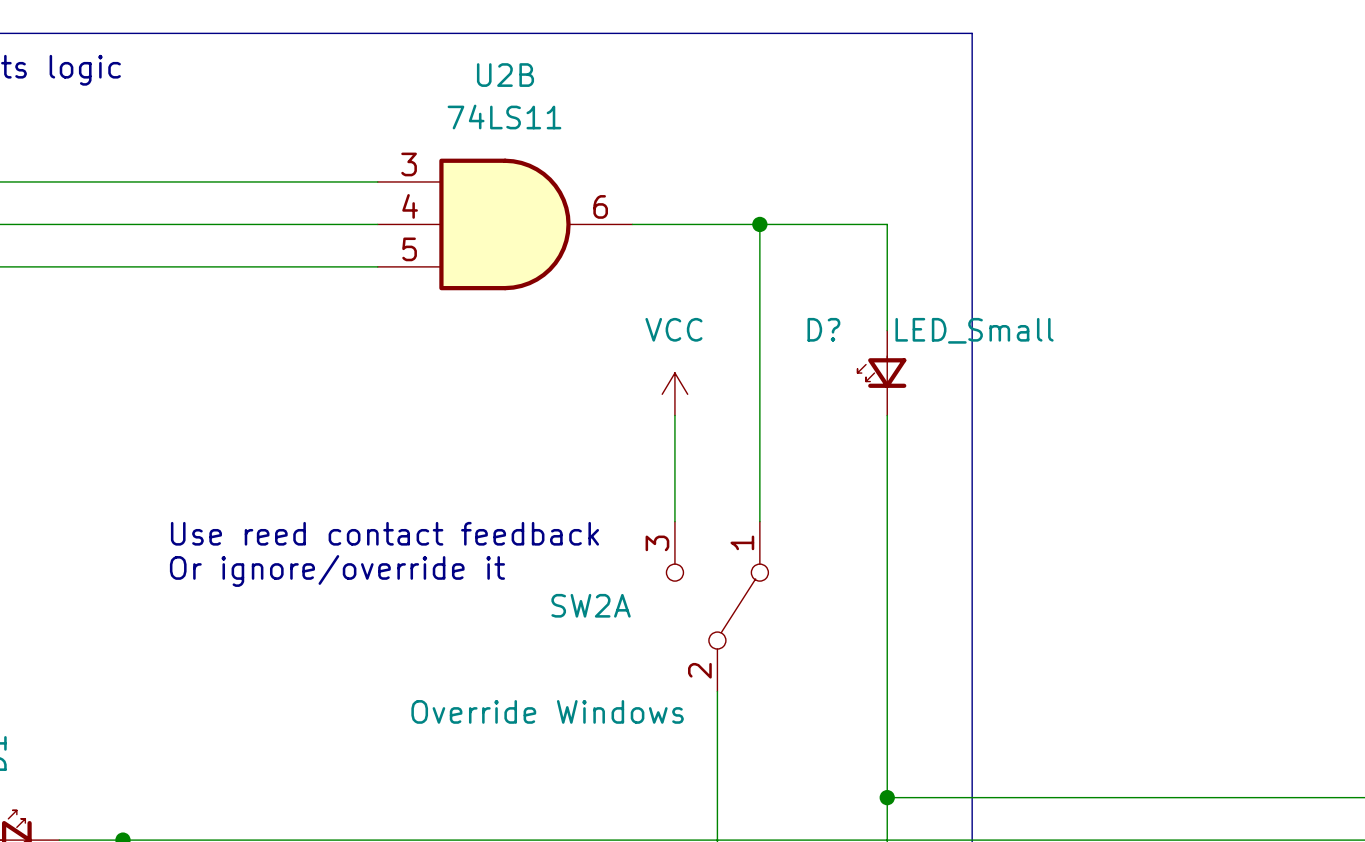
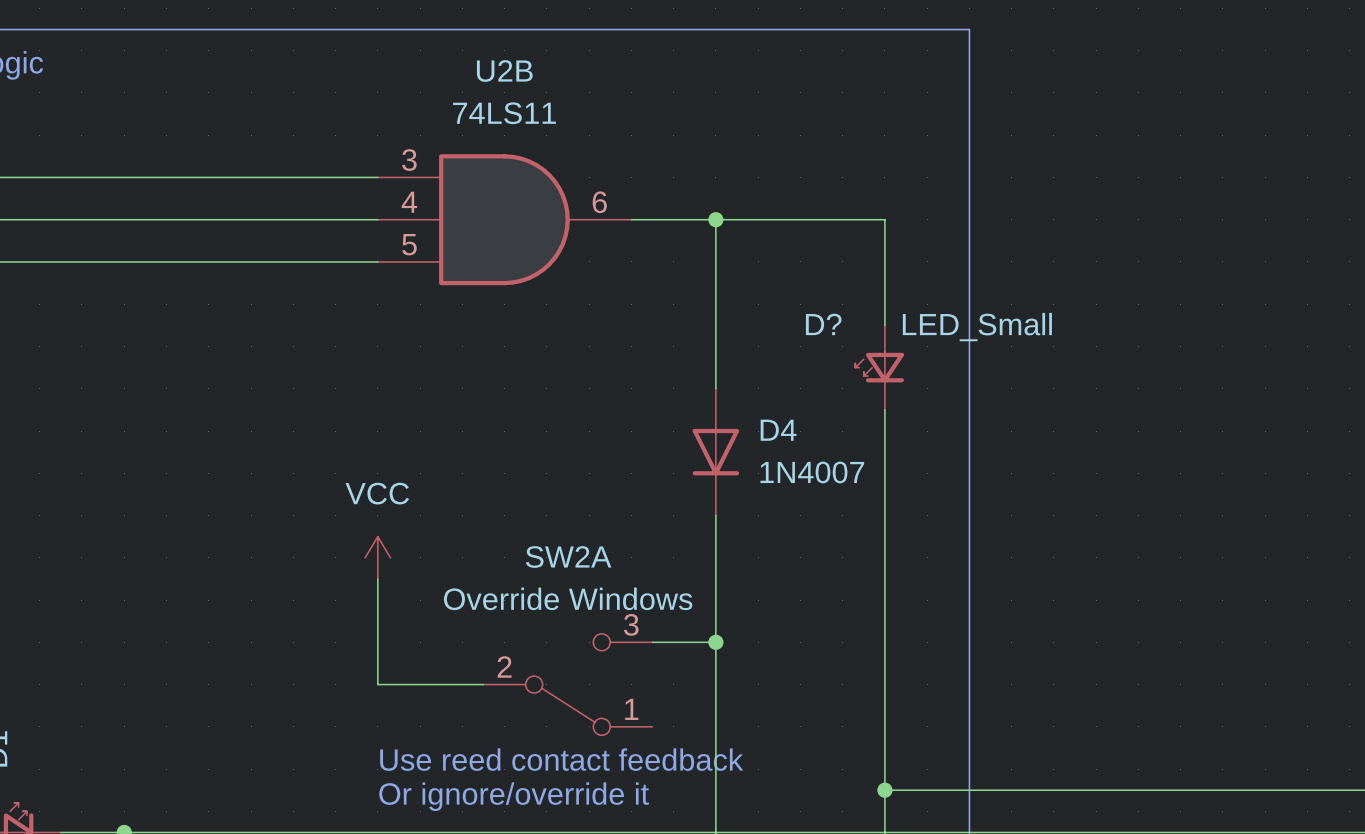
wire: none -> (715, 219) (715, 388)
wire: (759, 224) (759, 521) -> none
junction position: (759, 224) -> (715, 219)
power symbol position: VCC (674, 394) -> VCC (377, 557)
wire: (674, 415) (674, 521) -> none
D4: none -> 1N4007 (715, 452)
wire: none -> (715, 515) (715, 684)
text position: Use reed contact feedback (384, 533) -> Use reed contact feedback (561, 759)
text position: Or ignore/override it (337, 570) -> Or ignore/override it (514, 796)
wire: none -> (377, 578) (377, 684) (483, 684)
SW2A rotation: 0° (717, 606) -> 90° clockwise (567, 684)
SW2A position: (717, 606) -> (567, 684)
wire: none -> (652, 642) (715, 642)
junction: none -> (715, 642)
SW2A value position: Override Windows (547, 711) -> Override Windows (568, 598)

